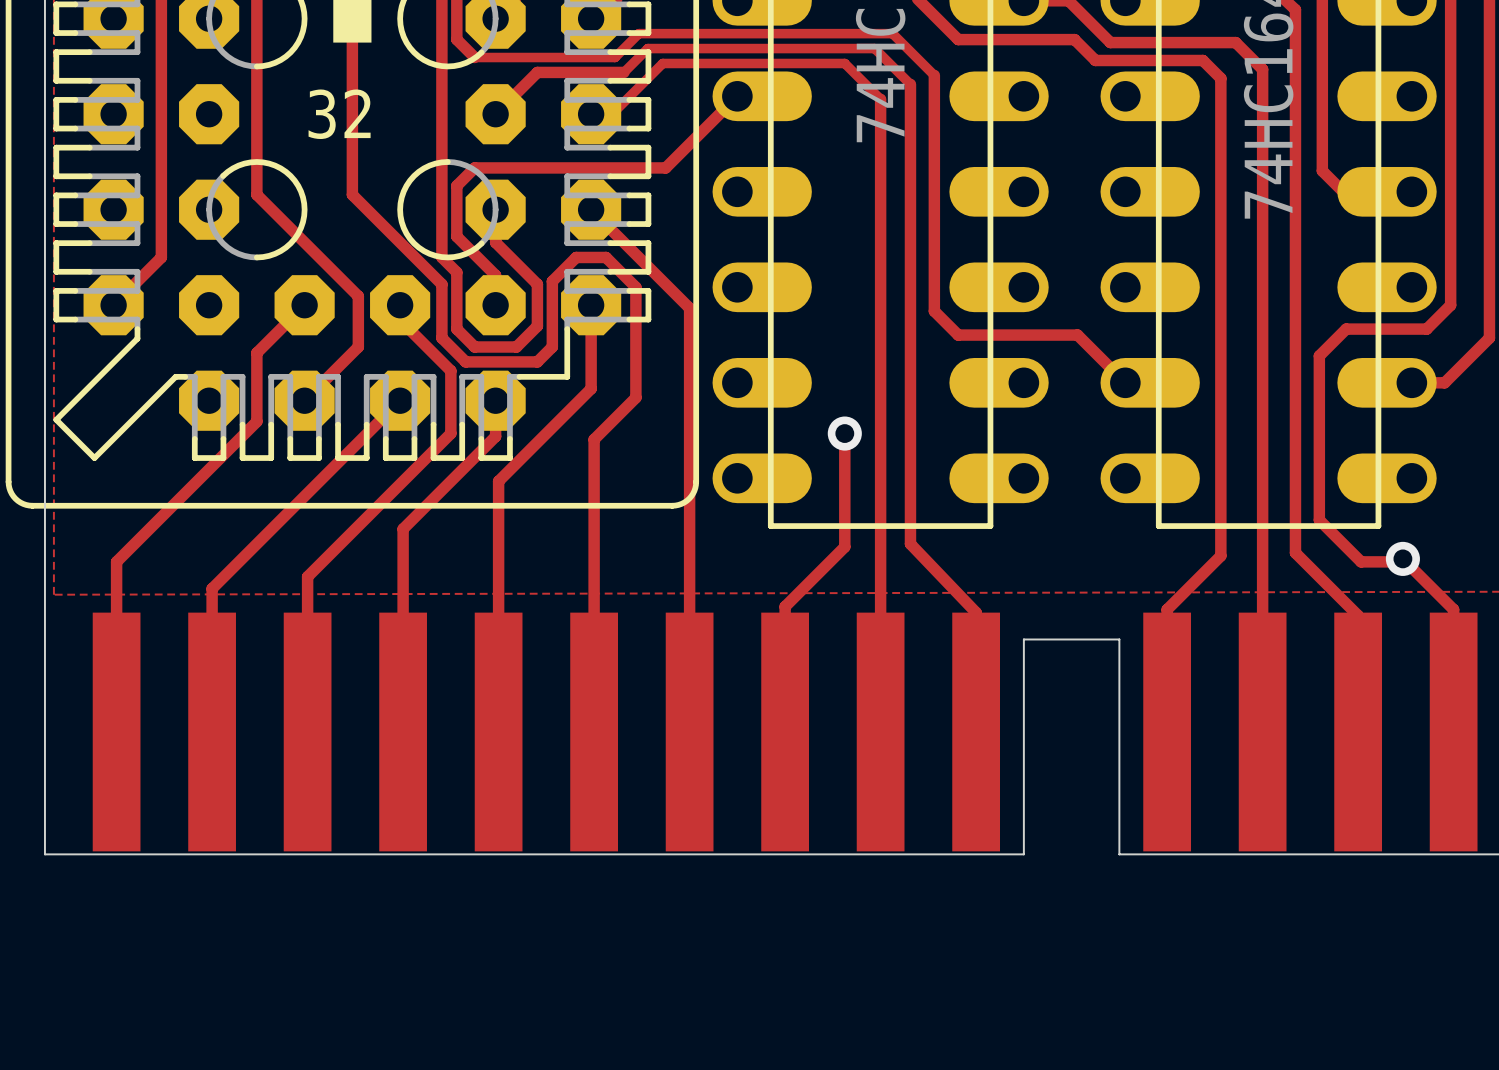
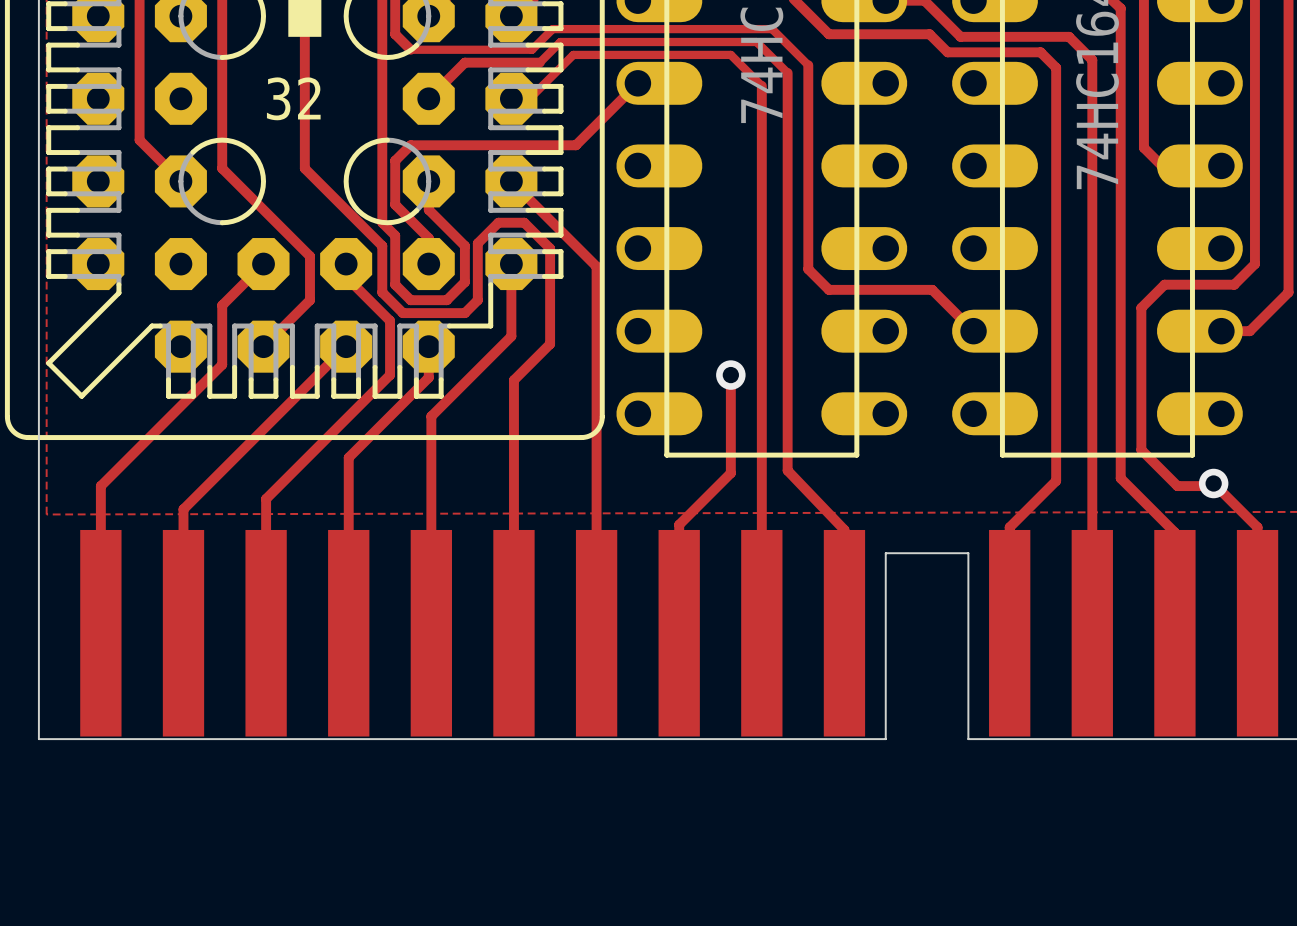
track: (161, 161) (161, 257) (113, 305) -> (139, 140) (180, 181)

